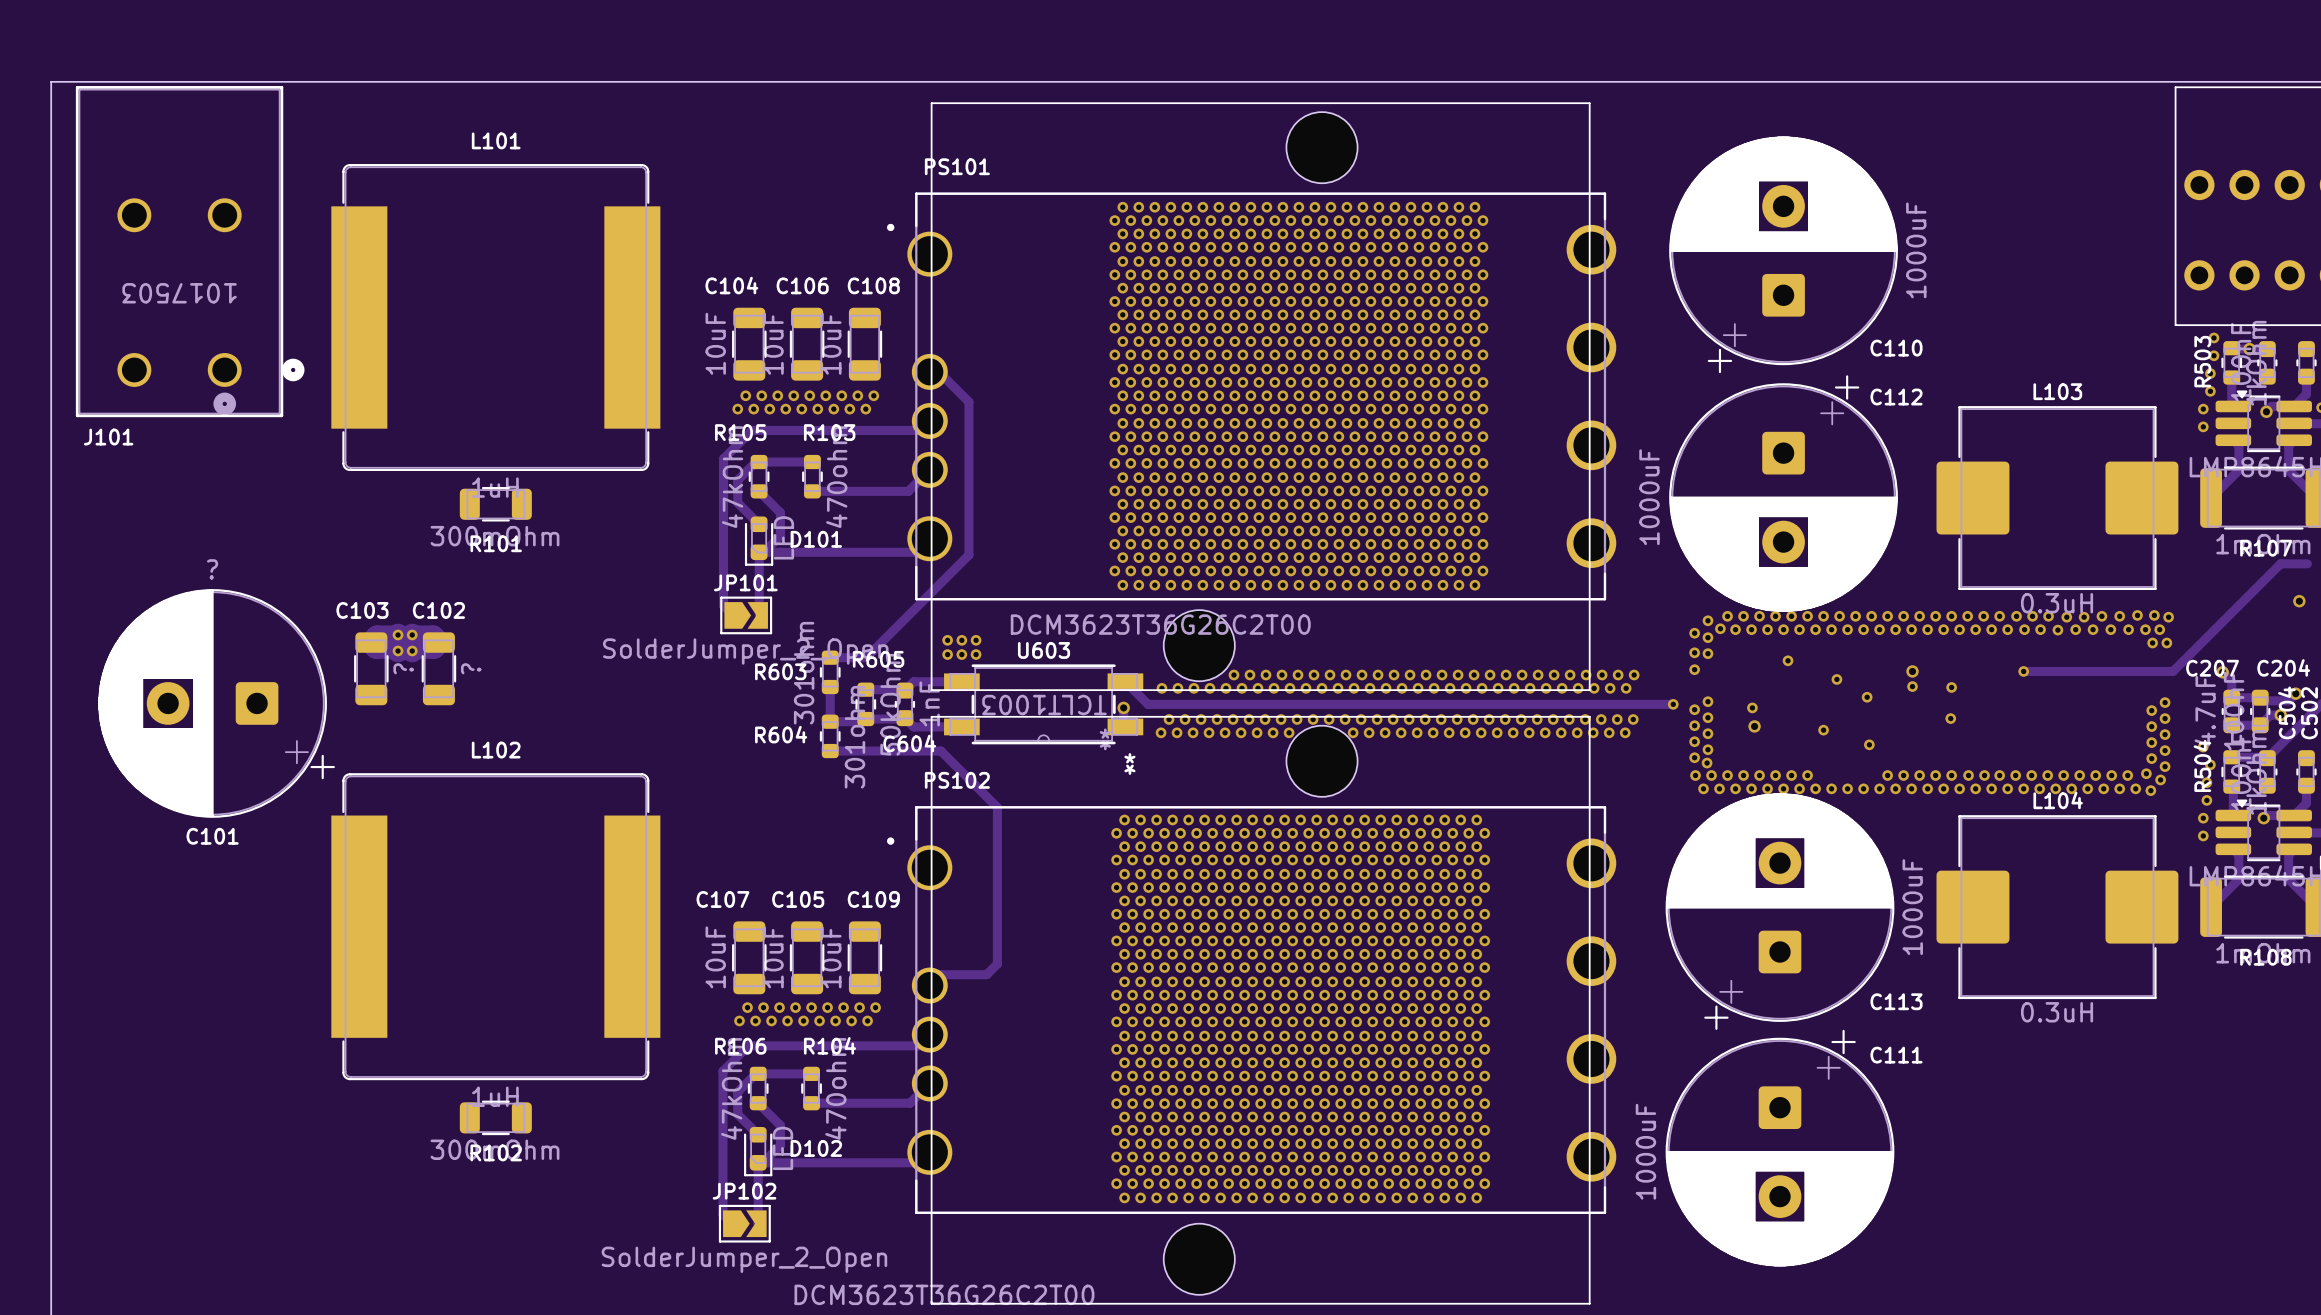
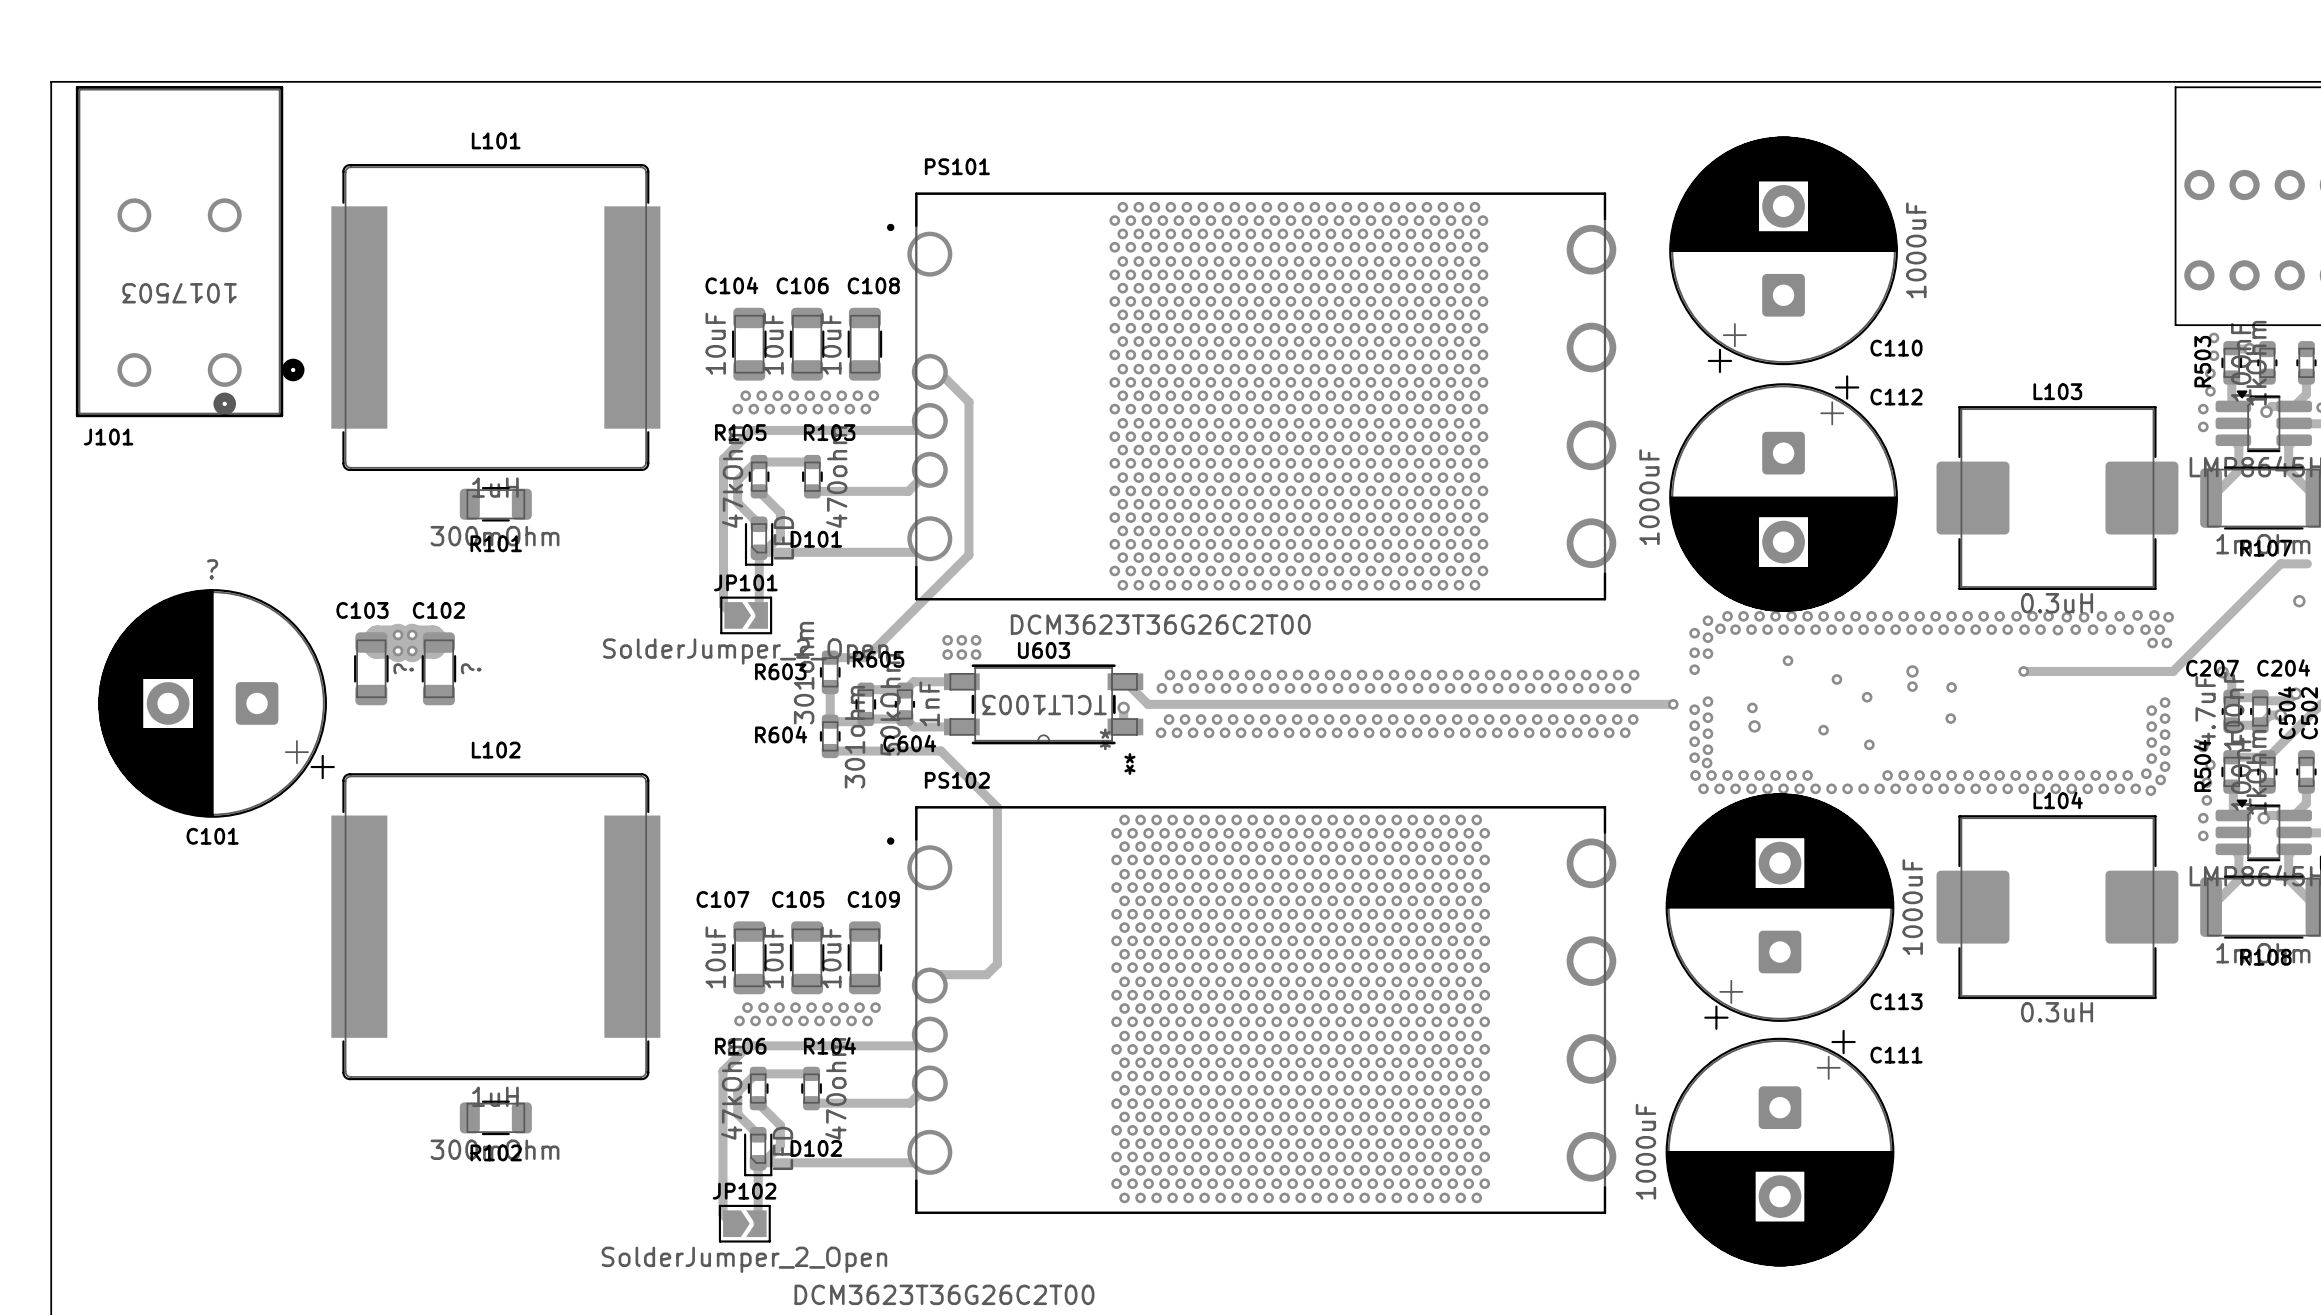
part: (1260, 396) -> none
via: none -> (1169, 675)
via: none -> (1185, 675)
via: none -> (1201, 675)
via: none -> (1217, 675)
via: none -> (1305, 732)
via: none -> (1321, 732)
via: none -> (1337, 732)
part: (1260, 1010) -> none

